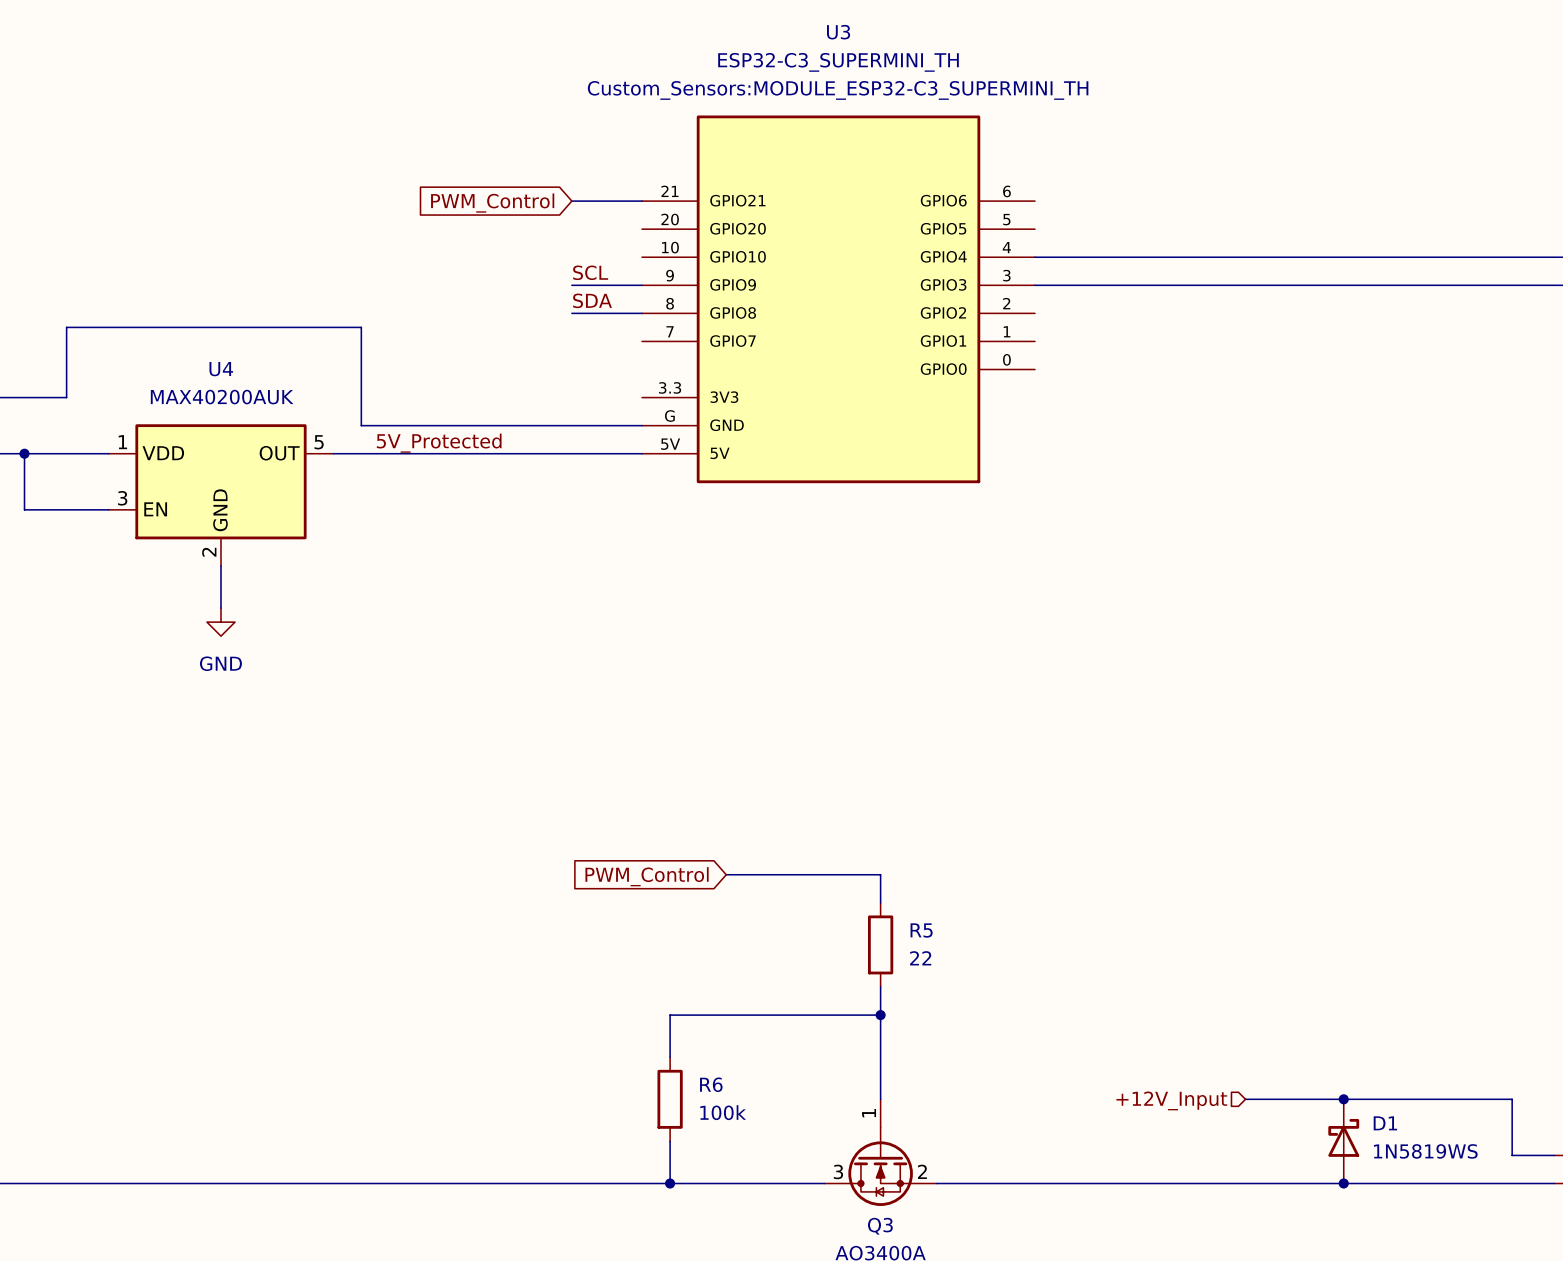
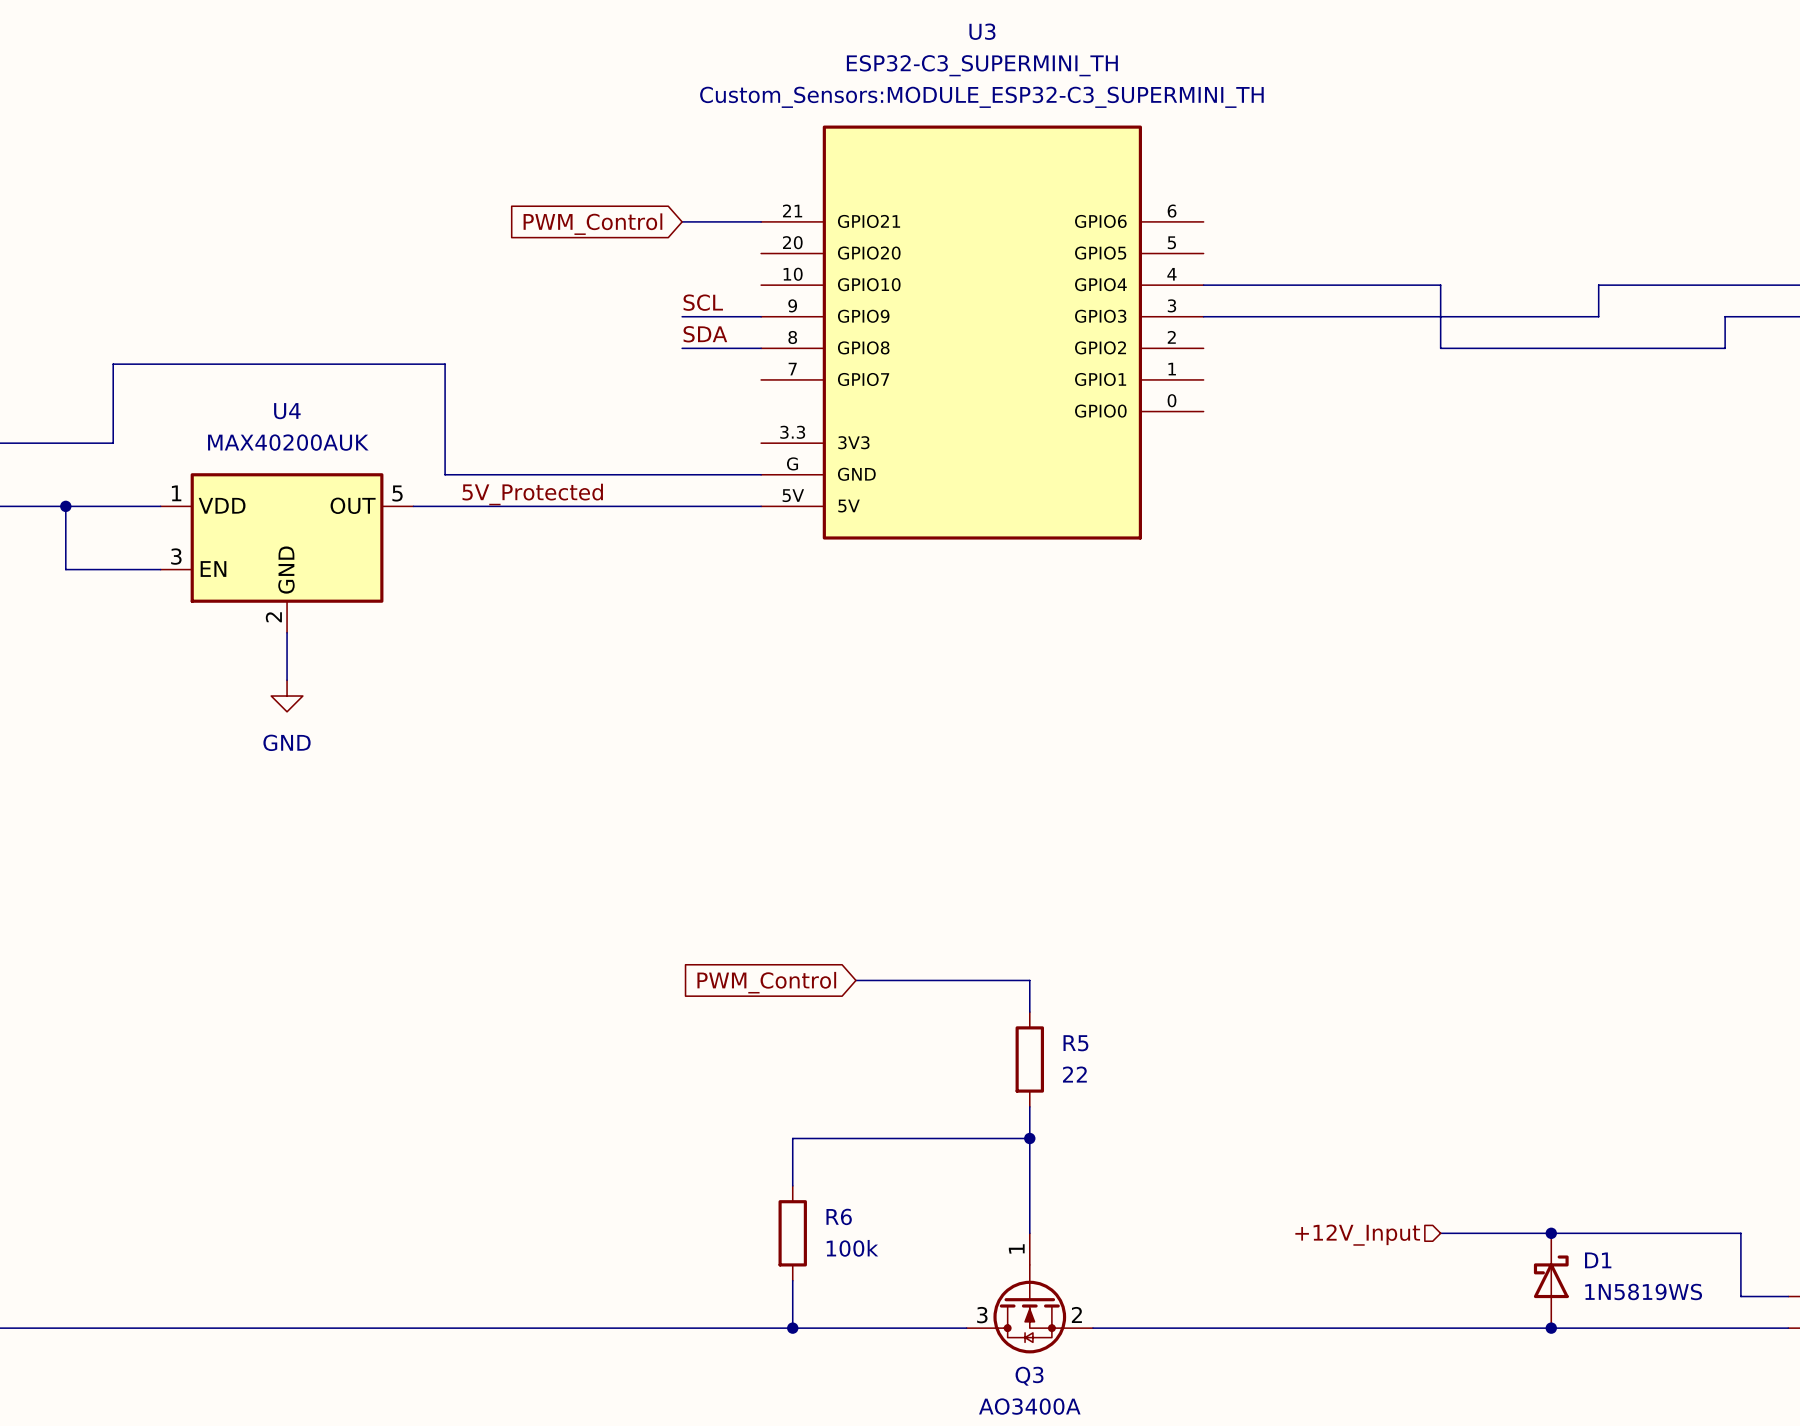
wire: (1245, 257) (1385, 257) -> (1440, 285) (1440, 348) (1725, 348) (1725, 316)
wire: (1385, 285) (1498, 285) -> (1598, 316) (1598, 285)

